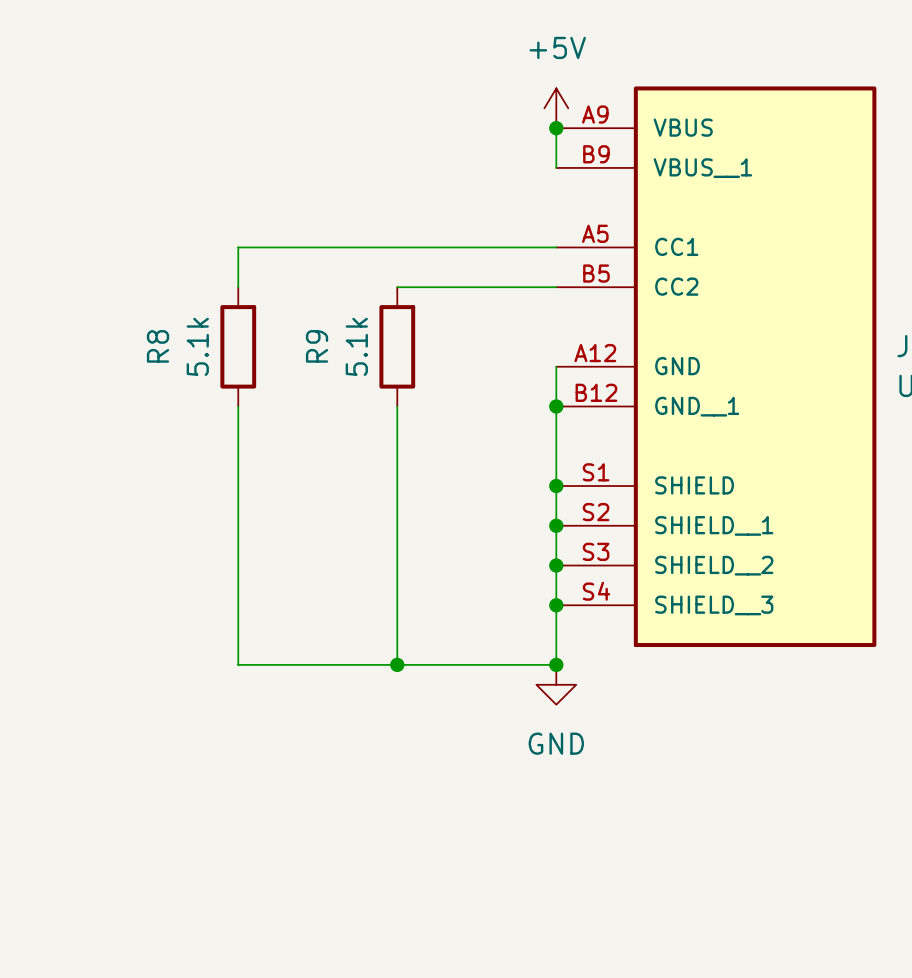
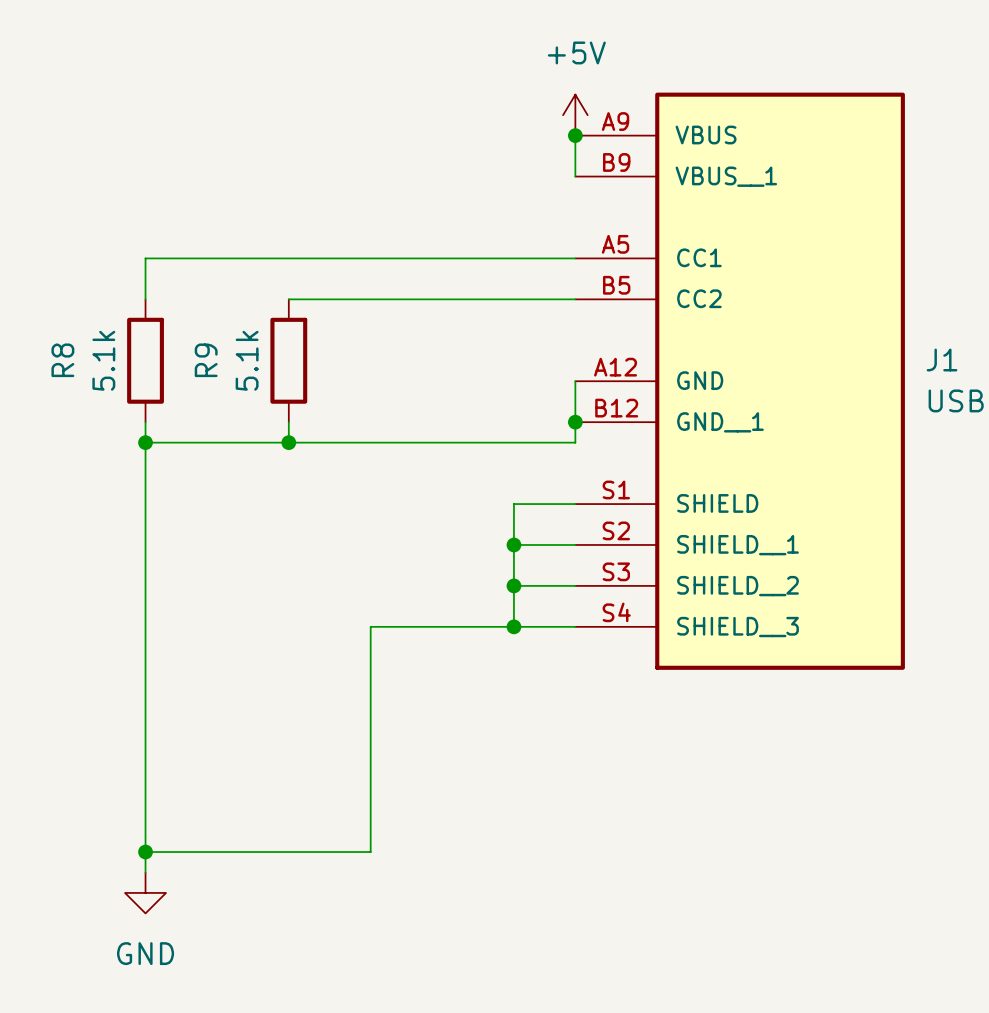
wire: (238, 247) (238, 287) -> (247, 258) (145, 258) (145, 299)
wire: none -> (288, 299) (411, 299)
R8 position: (238, 346) -> (145, 360)
R9 position: (397, 346) -> (288, 360)
wire: none -> (145, 422) (145, 872)
wire: (238, 406) (238, 664) (556, 664) (556, 426) -> (145, 442) (575, 442)
wire: none -> (288, 422) (288, 442)
wire: (397, 406) (397, 664) -> none
junction: none -> (145, 442)
junction: none -> (288, 442)
wire: none -> (575, 504) (513, 504) (513, 626)
junction: (556, 486) -> none
wire: none -> (513, 544) (575, 544)
junction: none -> (513, 544)
junction: (556, 525) -> none
wire: none -> (513, 585) (575, 585)
junction: none -> (513, 585)
junction: (556, 565) -> none
junction: none -> (513, 626)
wire: none -> (575, 626) (370, 626) (370, 852) (145, 852)
junction: (556, 605) -> none
junction: (397, 664) -> none
junction: (556, 664) -> none
power symbol: GND (556, 684) -> none
junction: none -> (145, 852)
power symbol: none -> GND (145, 892)

